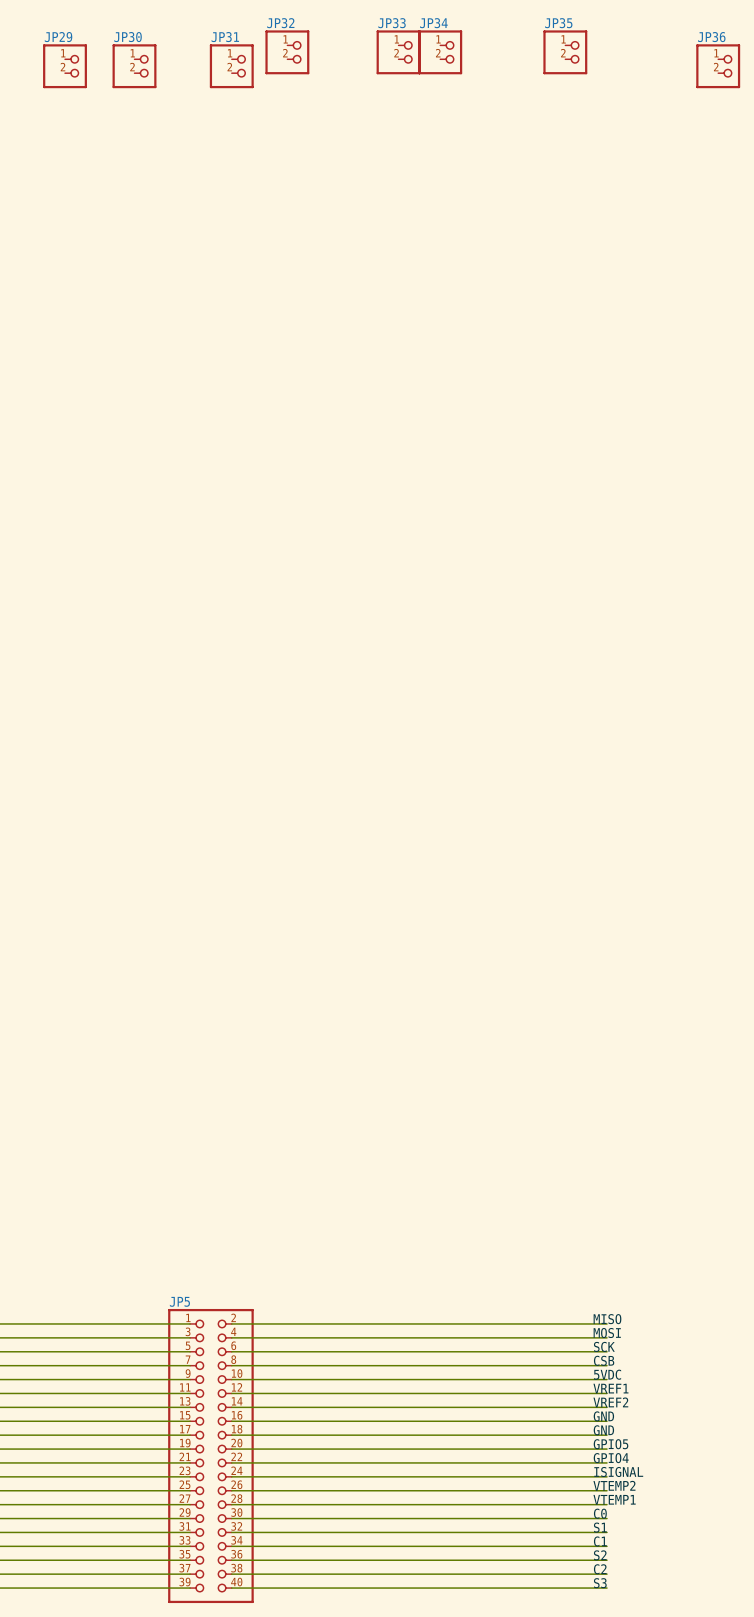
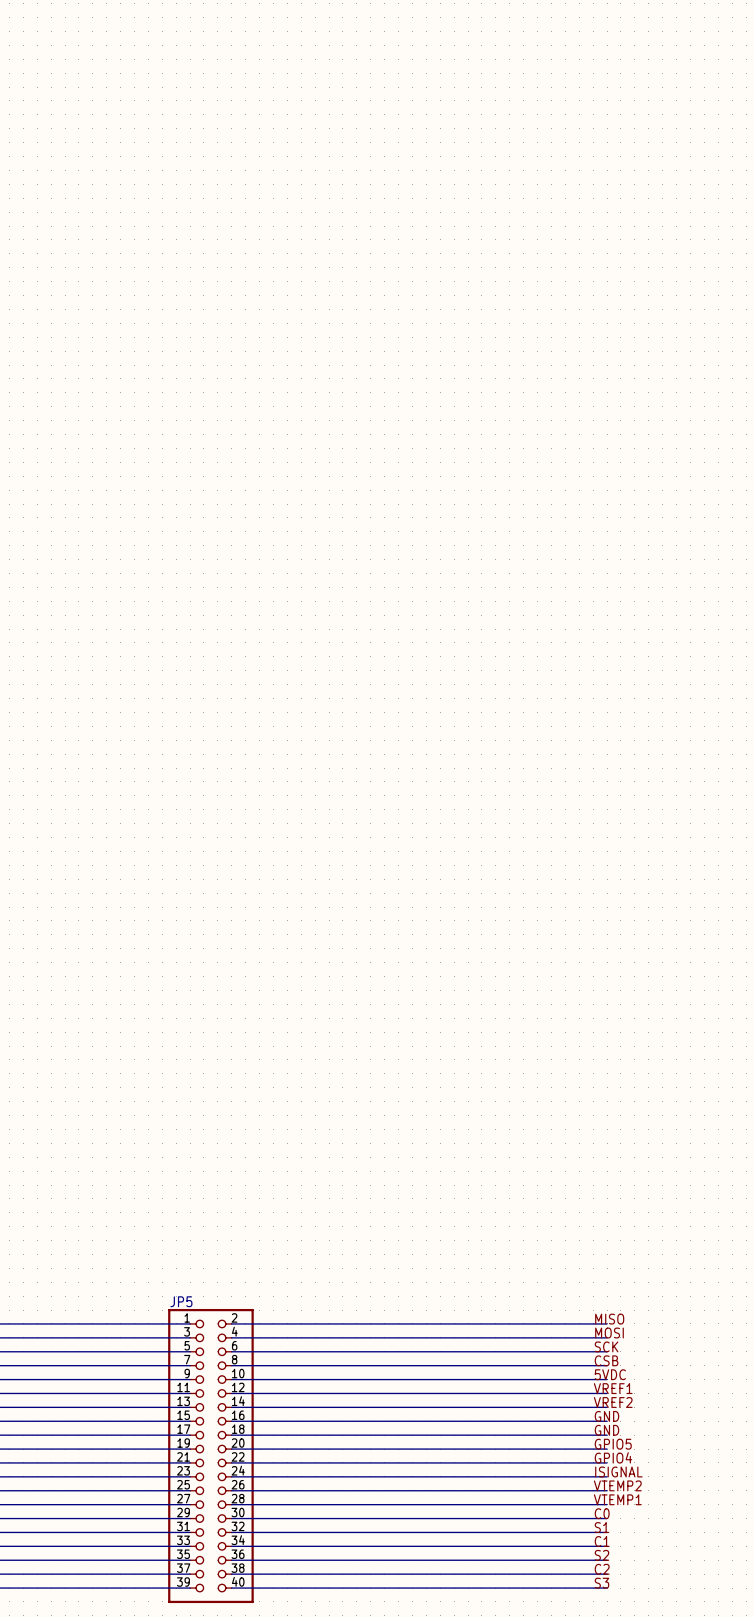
JP32: (287, 52) -> none
JP33: (398, 52) -> none
JP34: (440, 52) -> none
JP35: (565, 52) -> none
JP29: (65, 66) -> none
JP30: (134, 66) -> none
JP31: (231, 66) -> none
JP36: (718, 66) -> none

